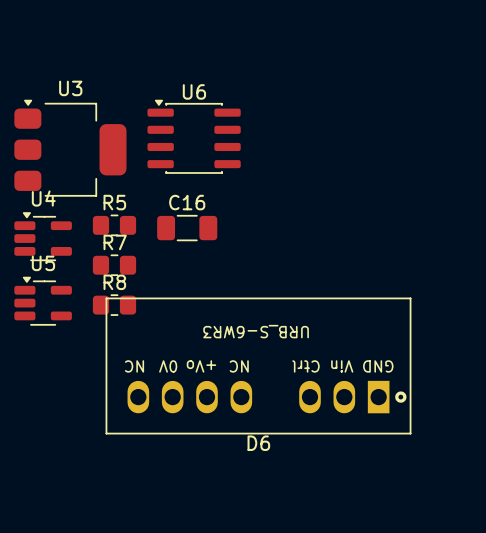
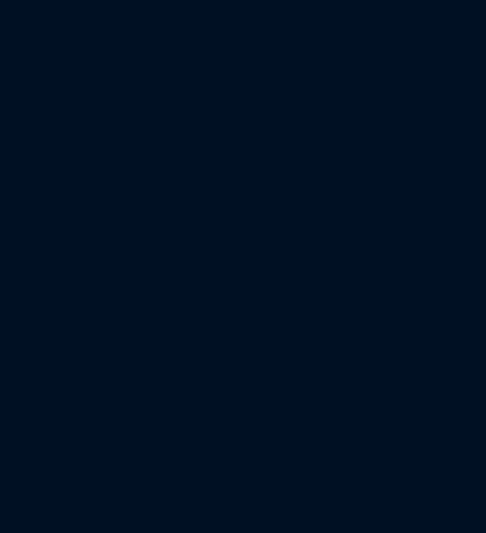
U6: (194, 136) -> none
U3: (70, 148) -> none
R5: (114, 225) -> none
C16: (187, 228) -> none
U4: (43, 236) -> none
R7: (114, 265) -> none
U5: (43, 301) -> none
R8: (114, 305) -> none
D6: (258, 365) -> none

